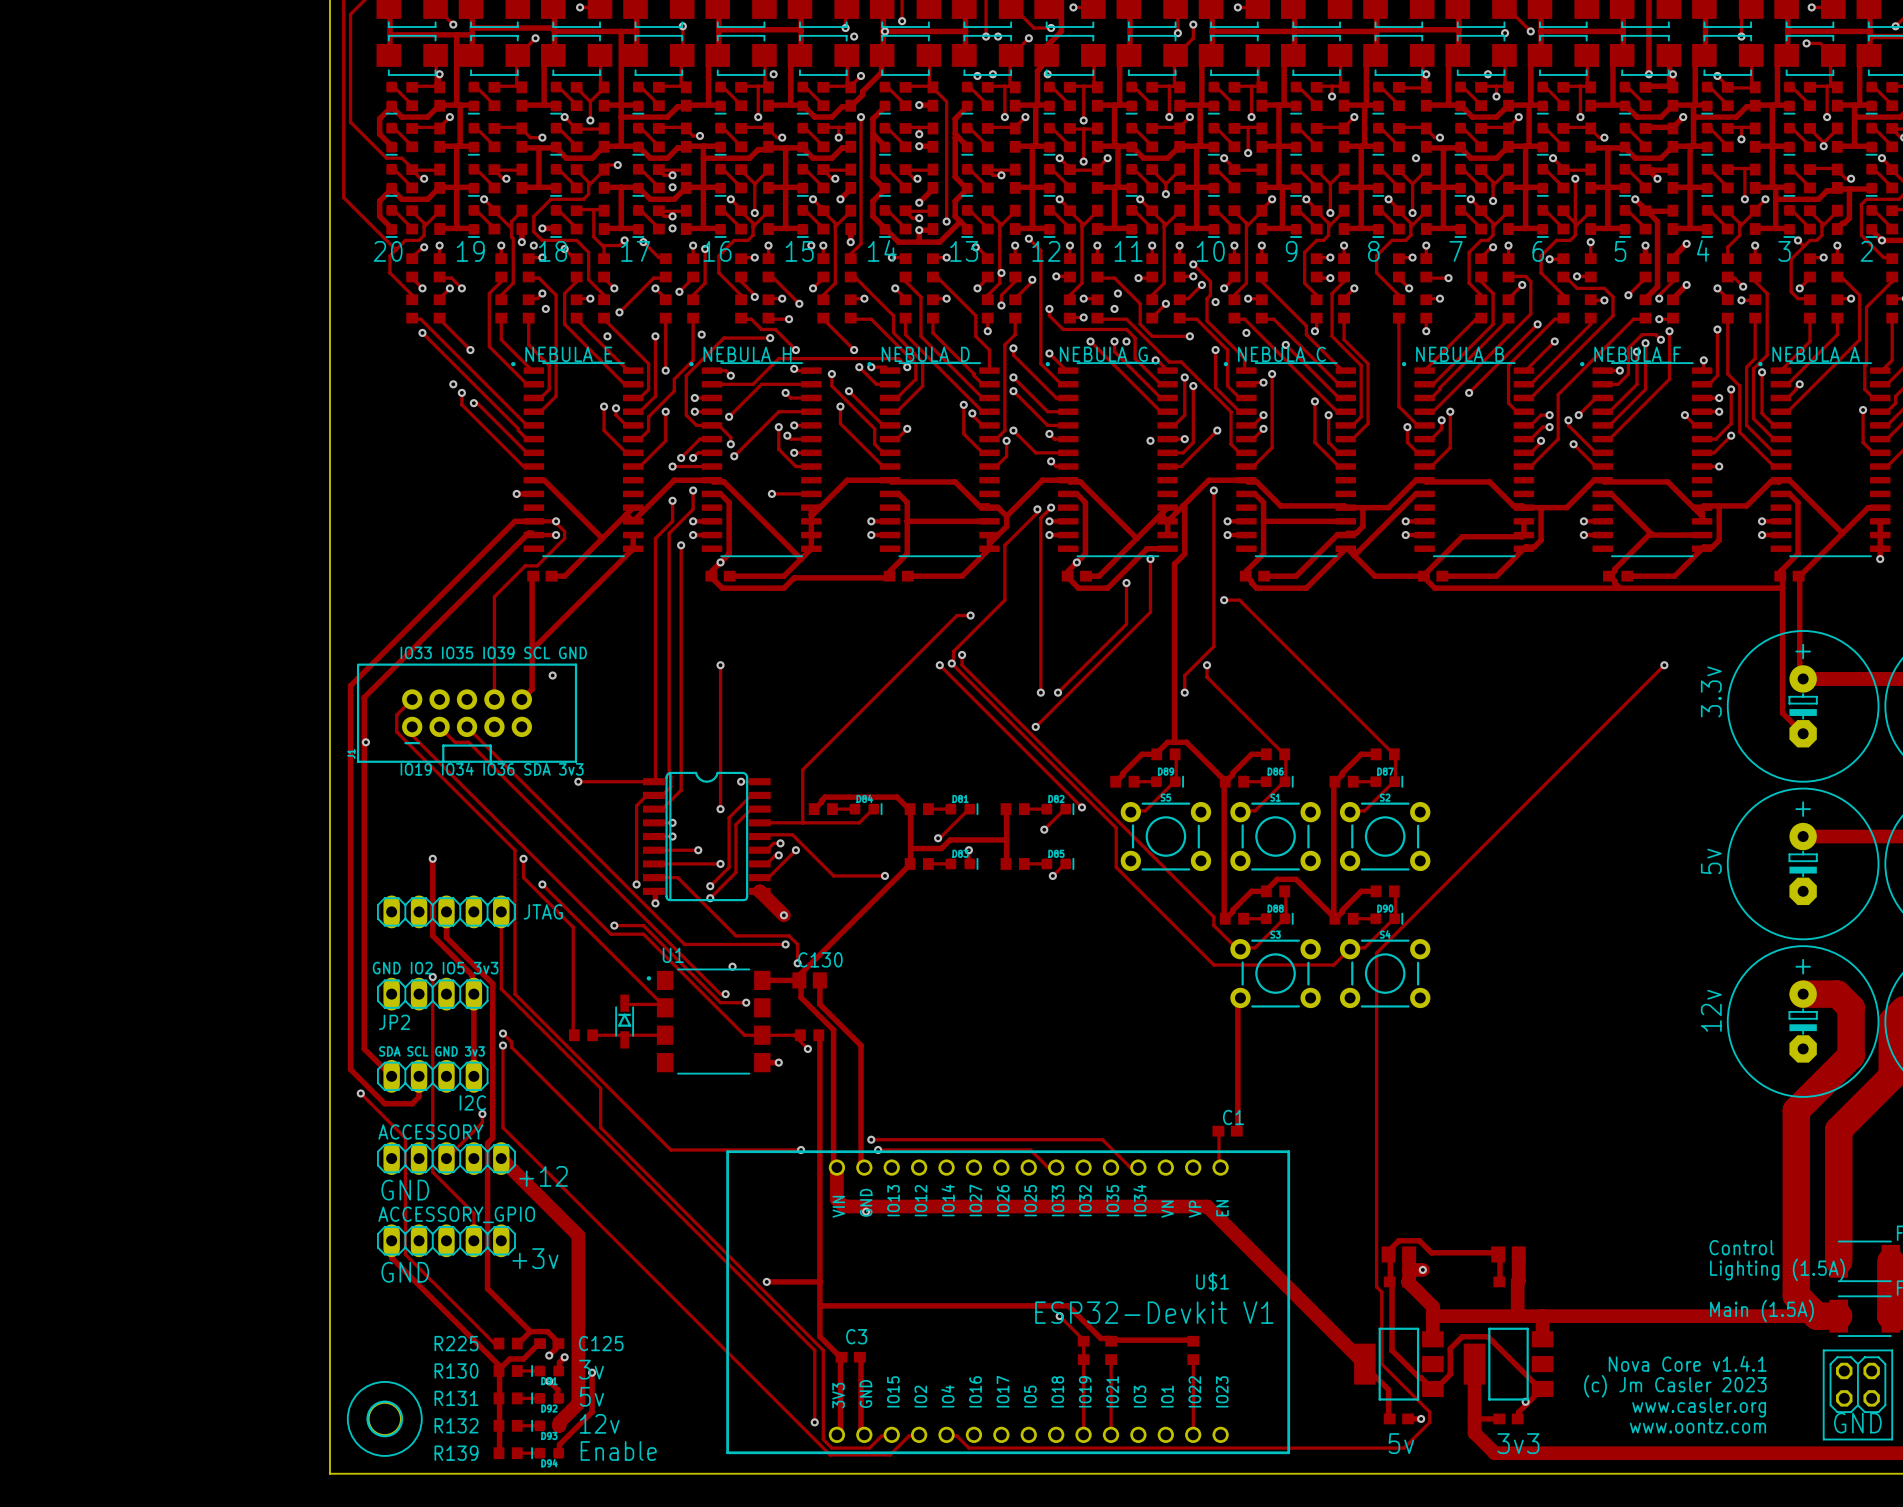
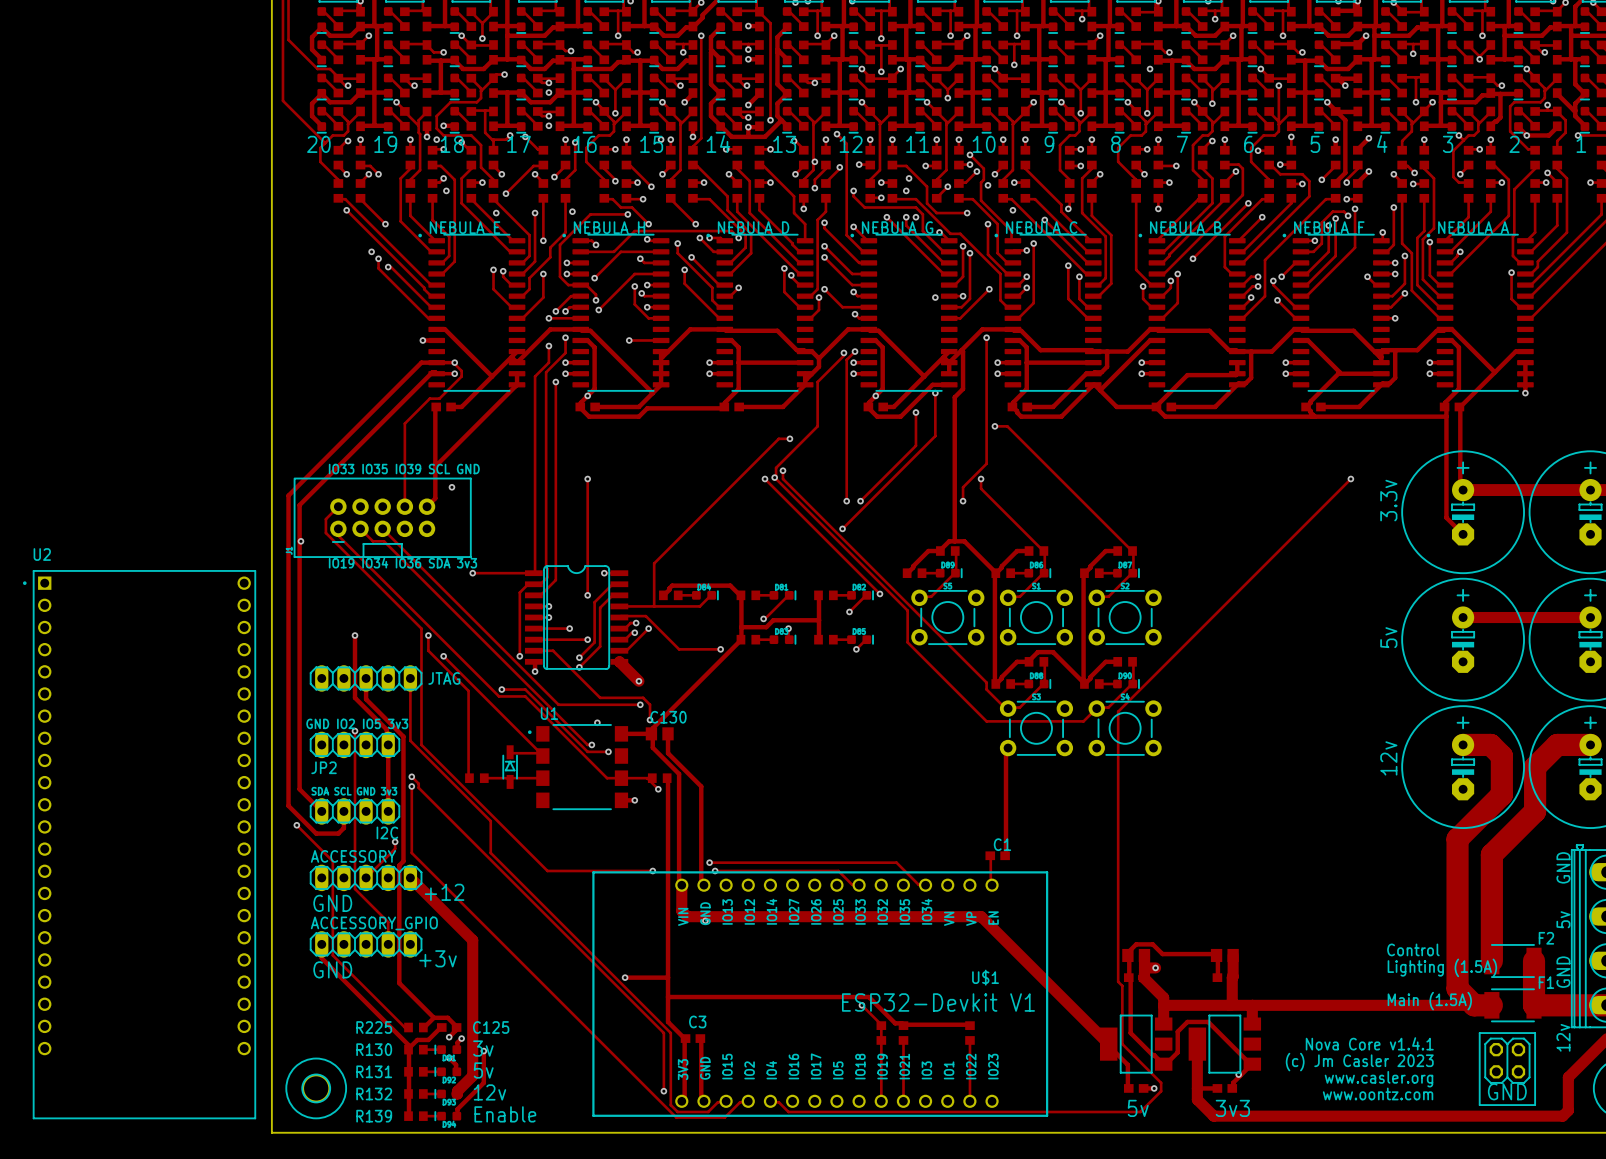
U2: none -> (139, 844)

